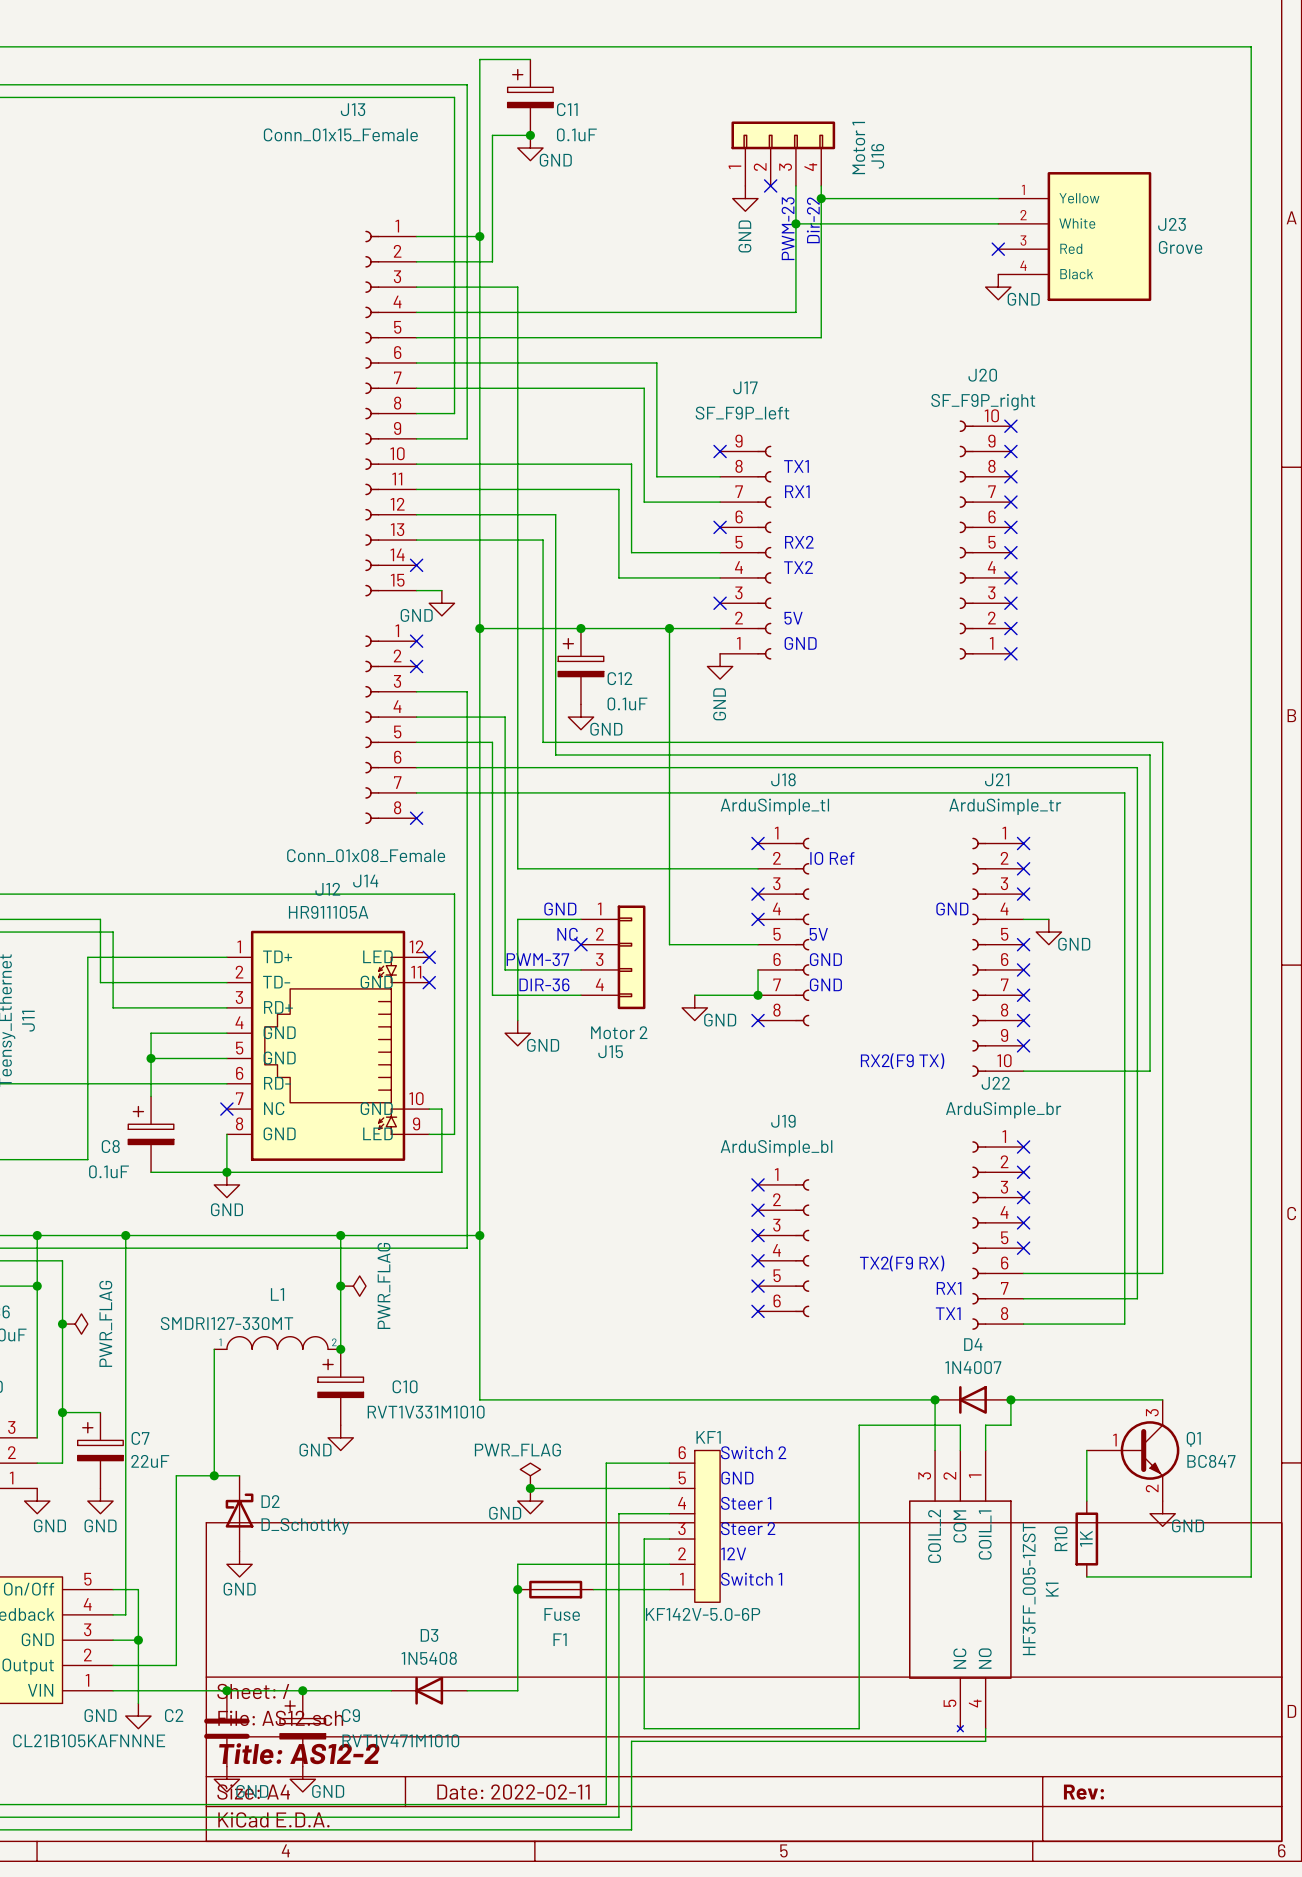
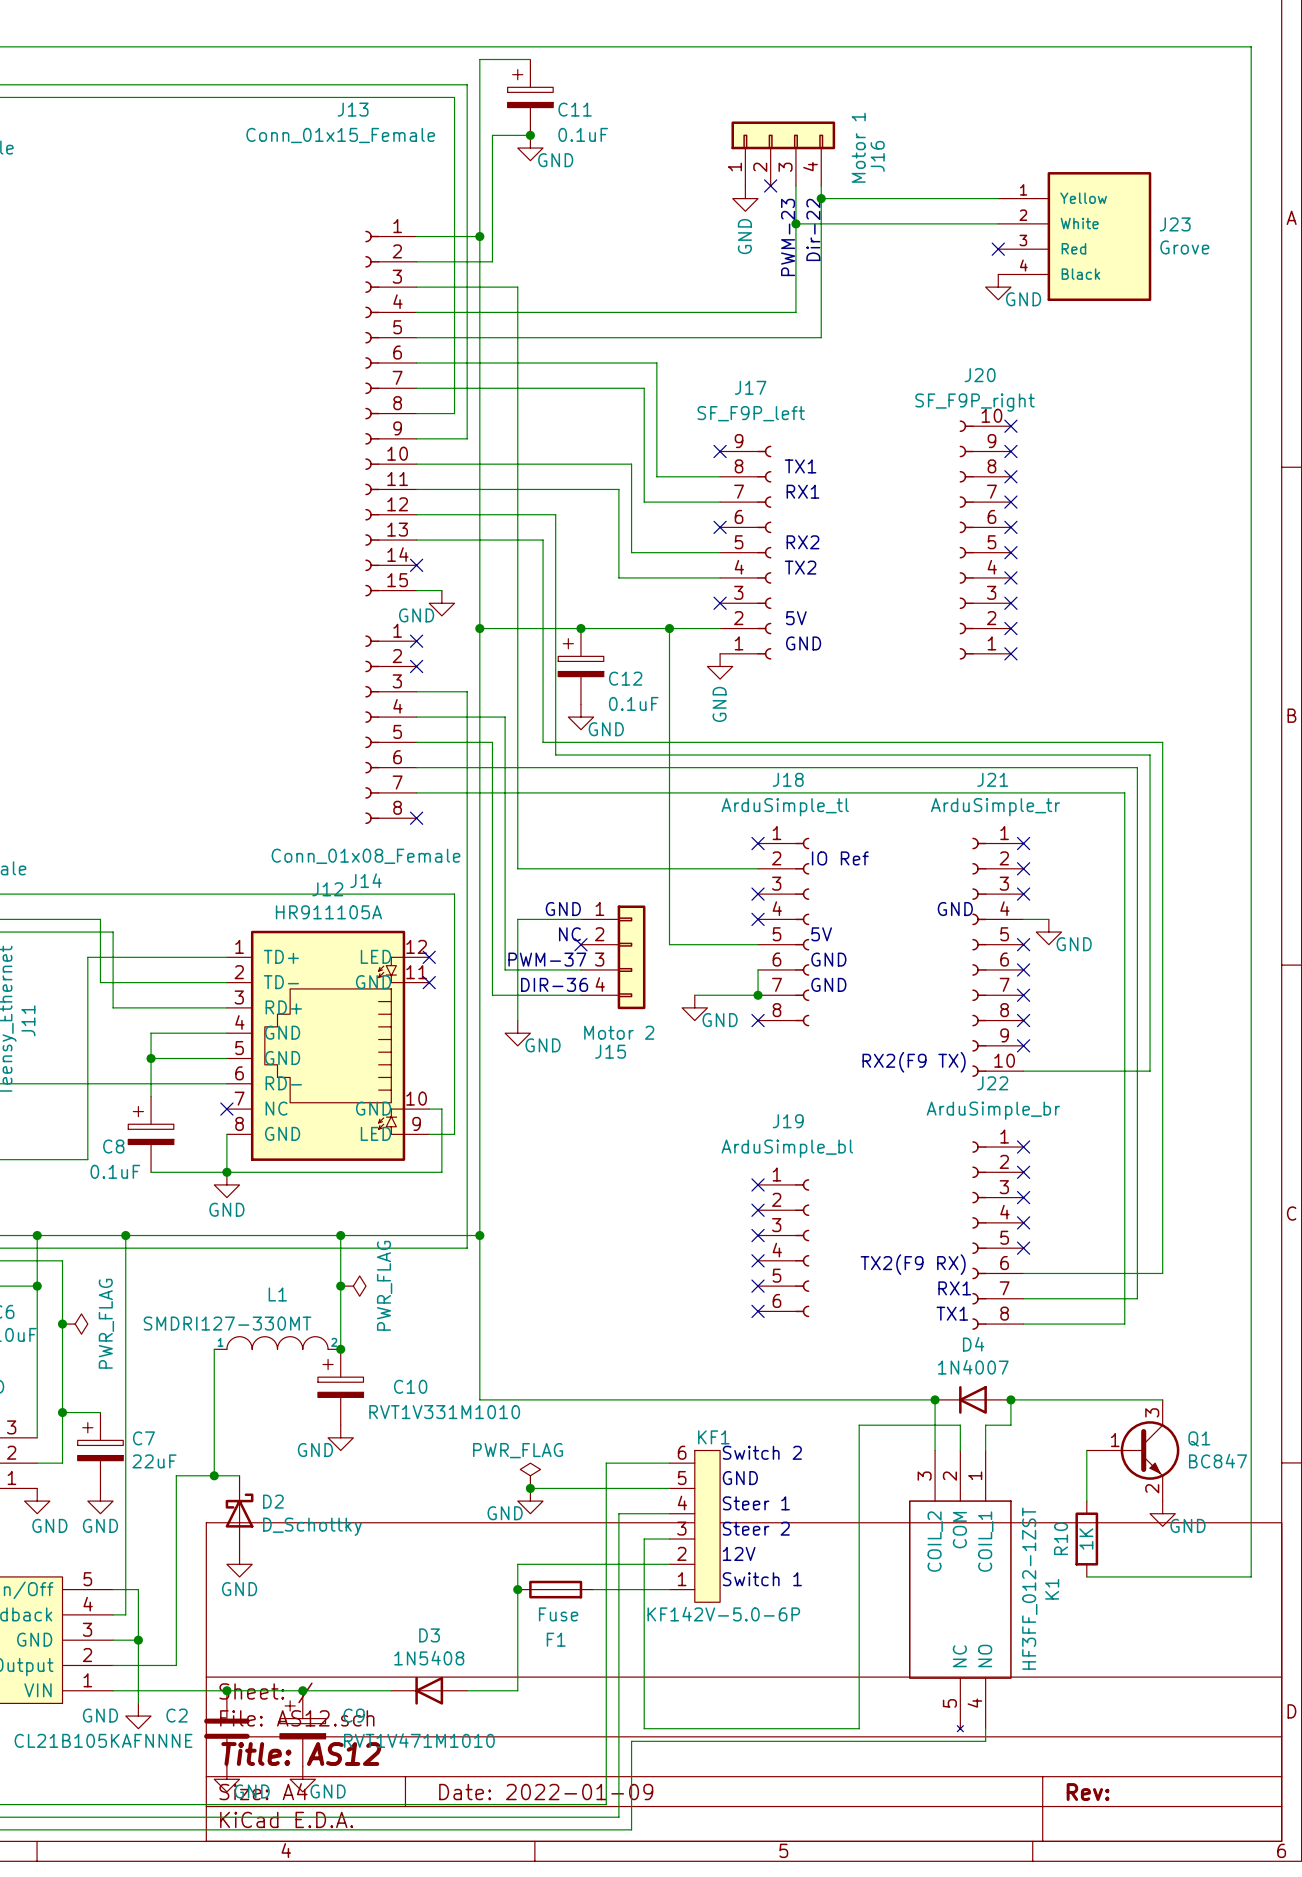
K1 value: HF3FF_005-1ZST (1029, 1589) -> HF3FF_012-1ZST (1029, 1588)
title block: Title: AS12-2 (299, 1753) -> Title: AS12 (301, 1754)
title block: Date: 2022-02-11 (513, 1792) -> Date: 2022-01-09 (546, 1792)

